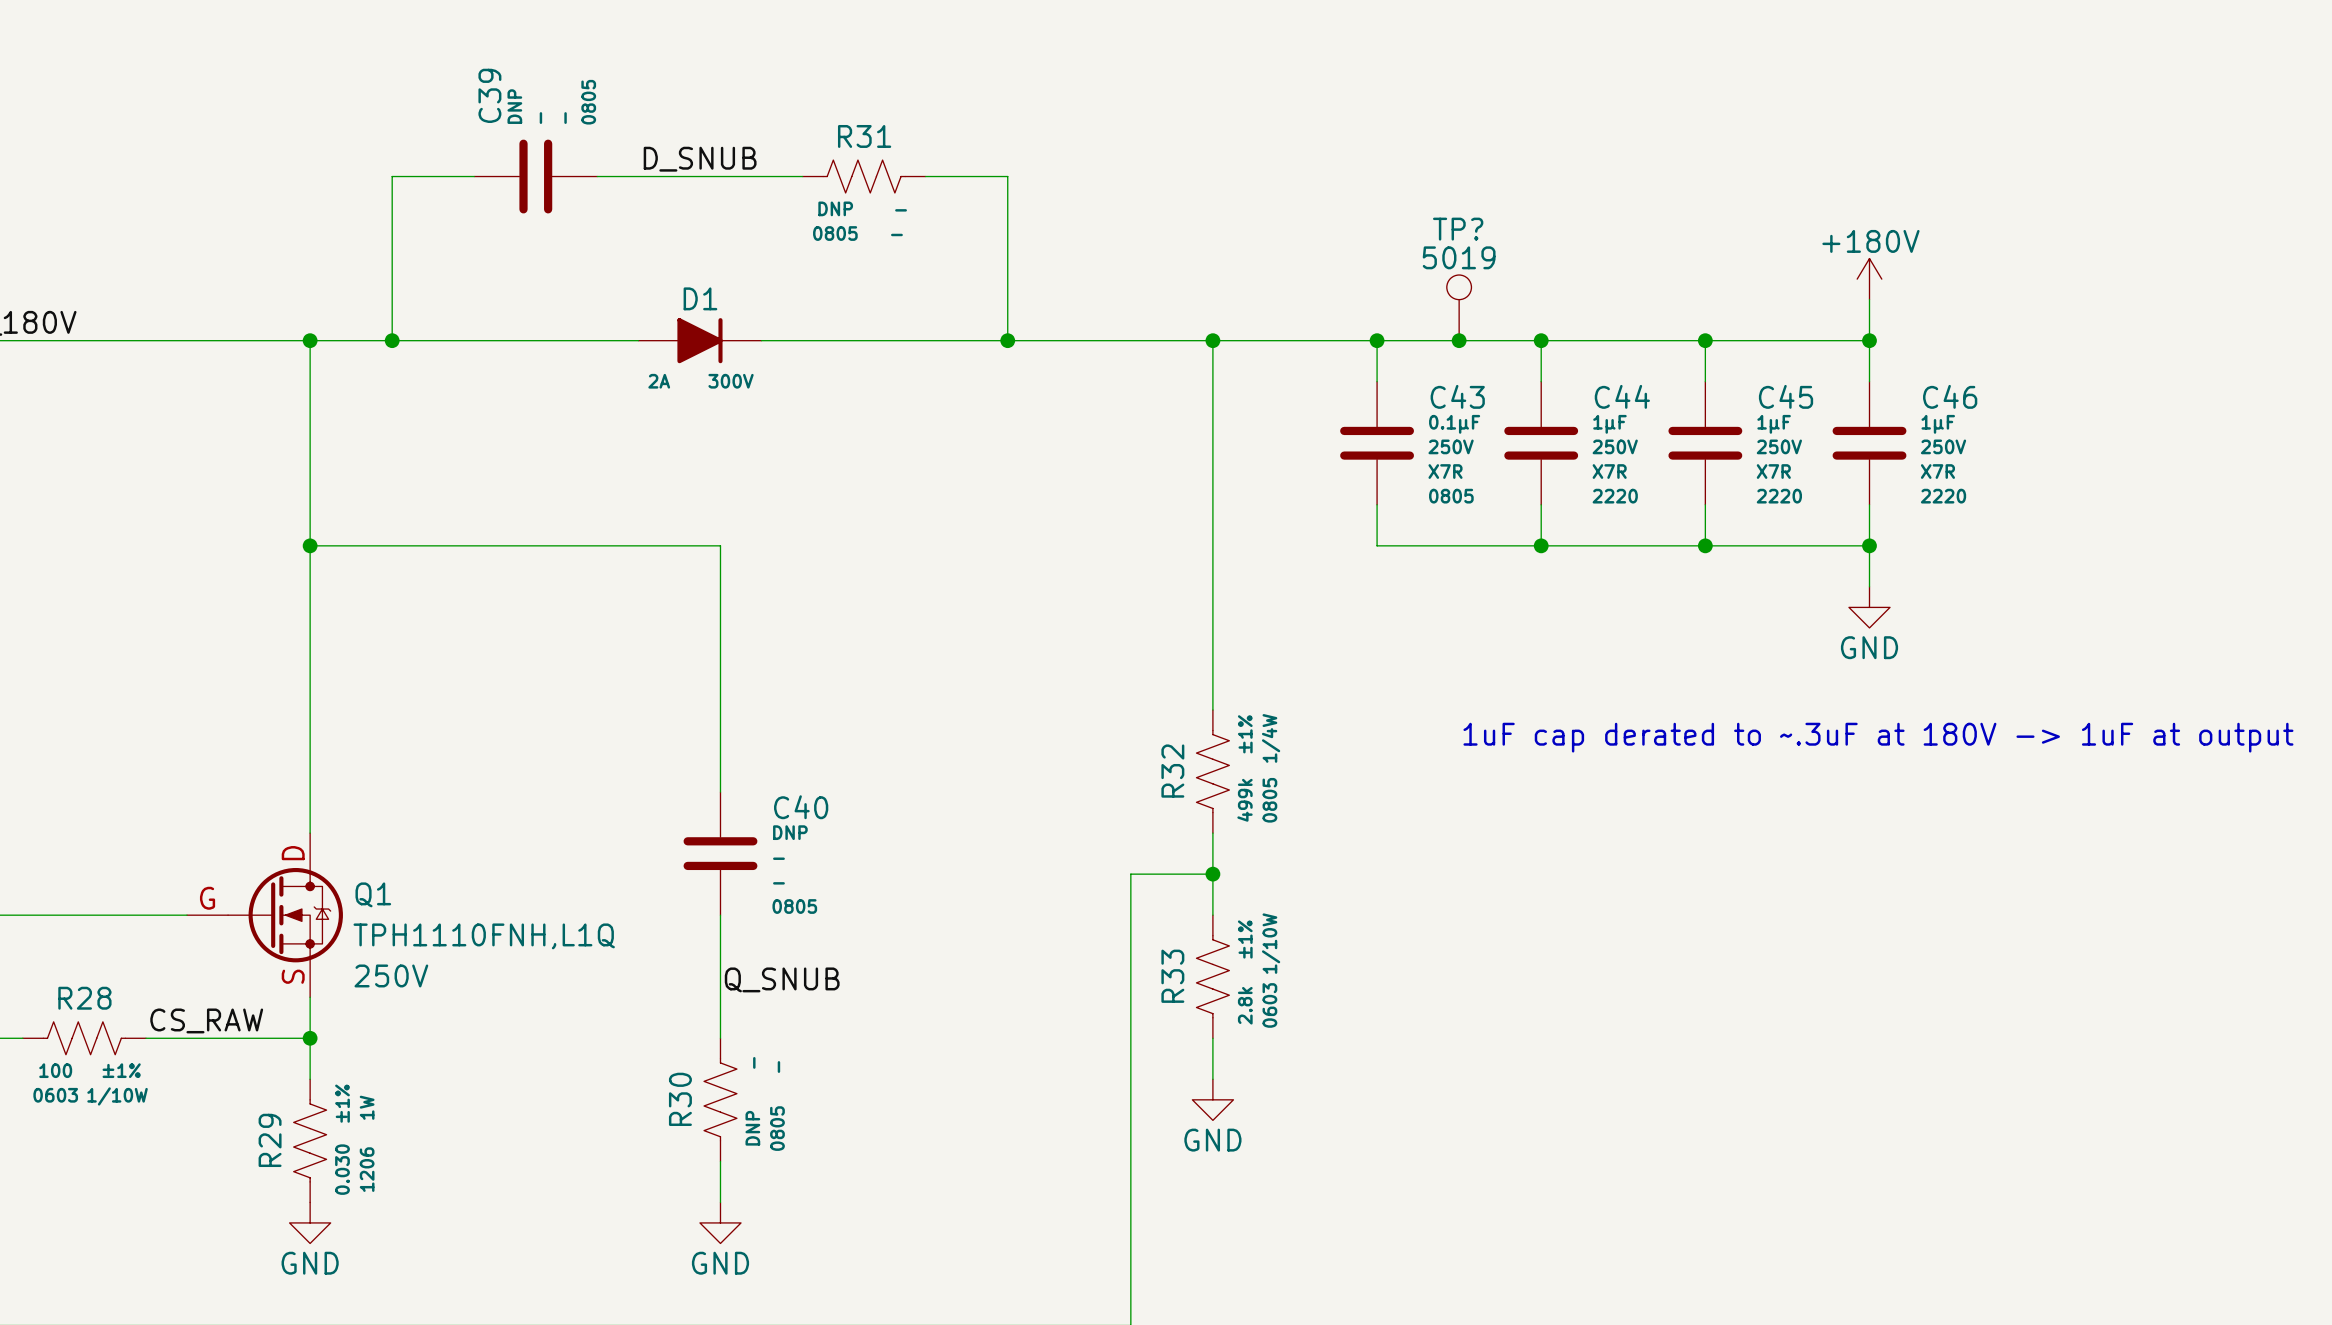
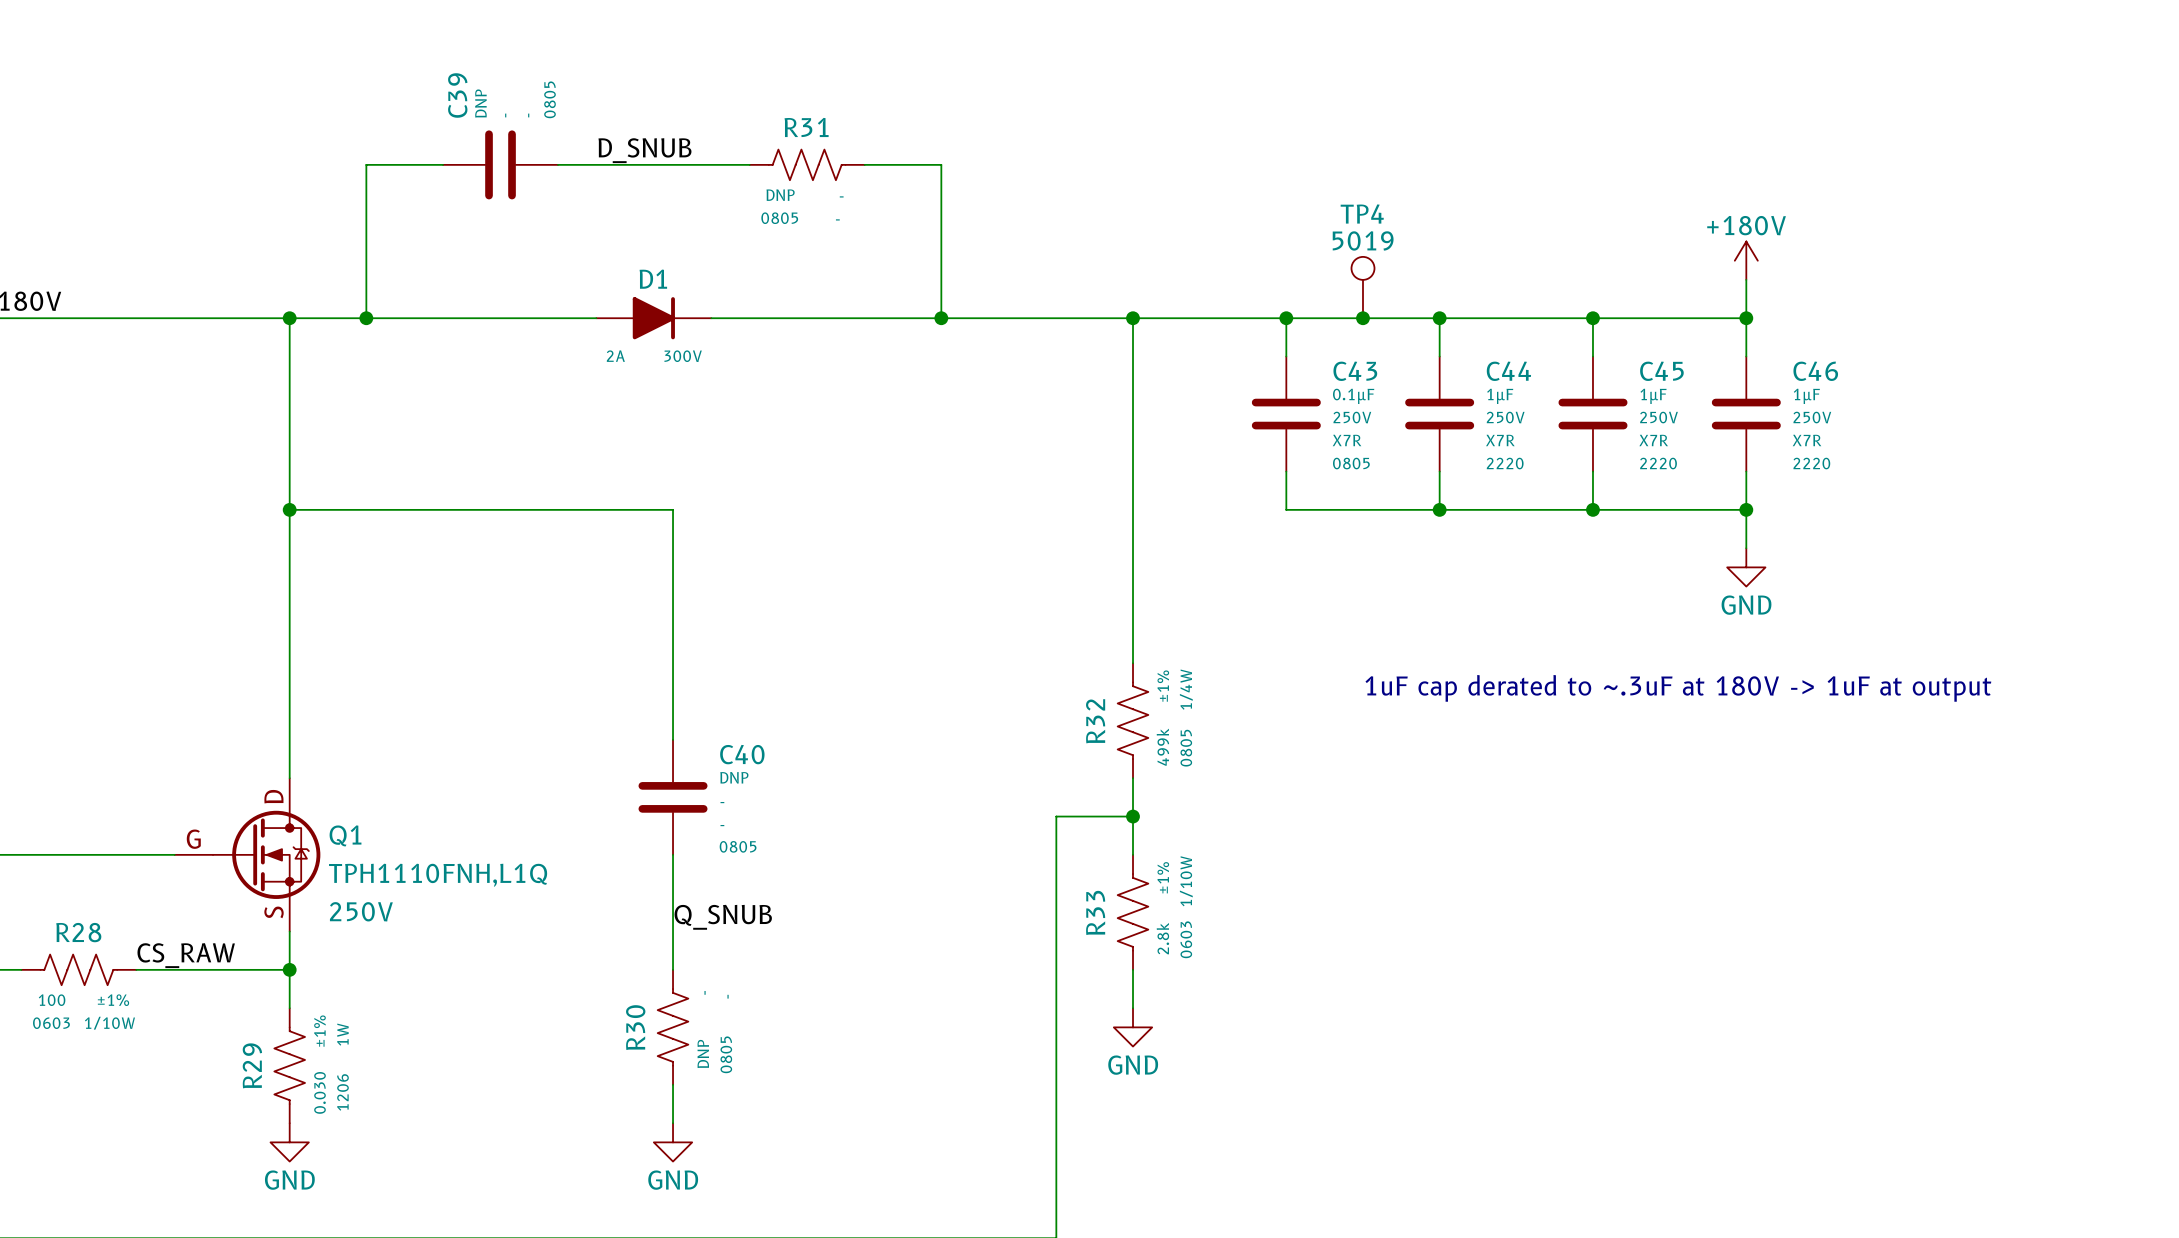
TP? name: TP? (1458, 229) -> TP4 (1362, 214)

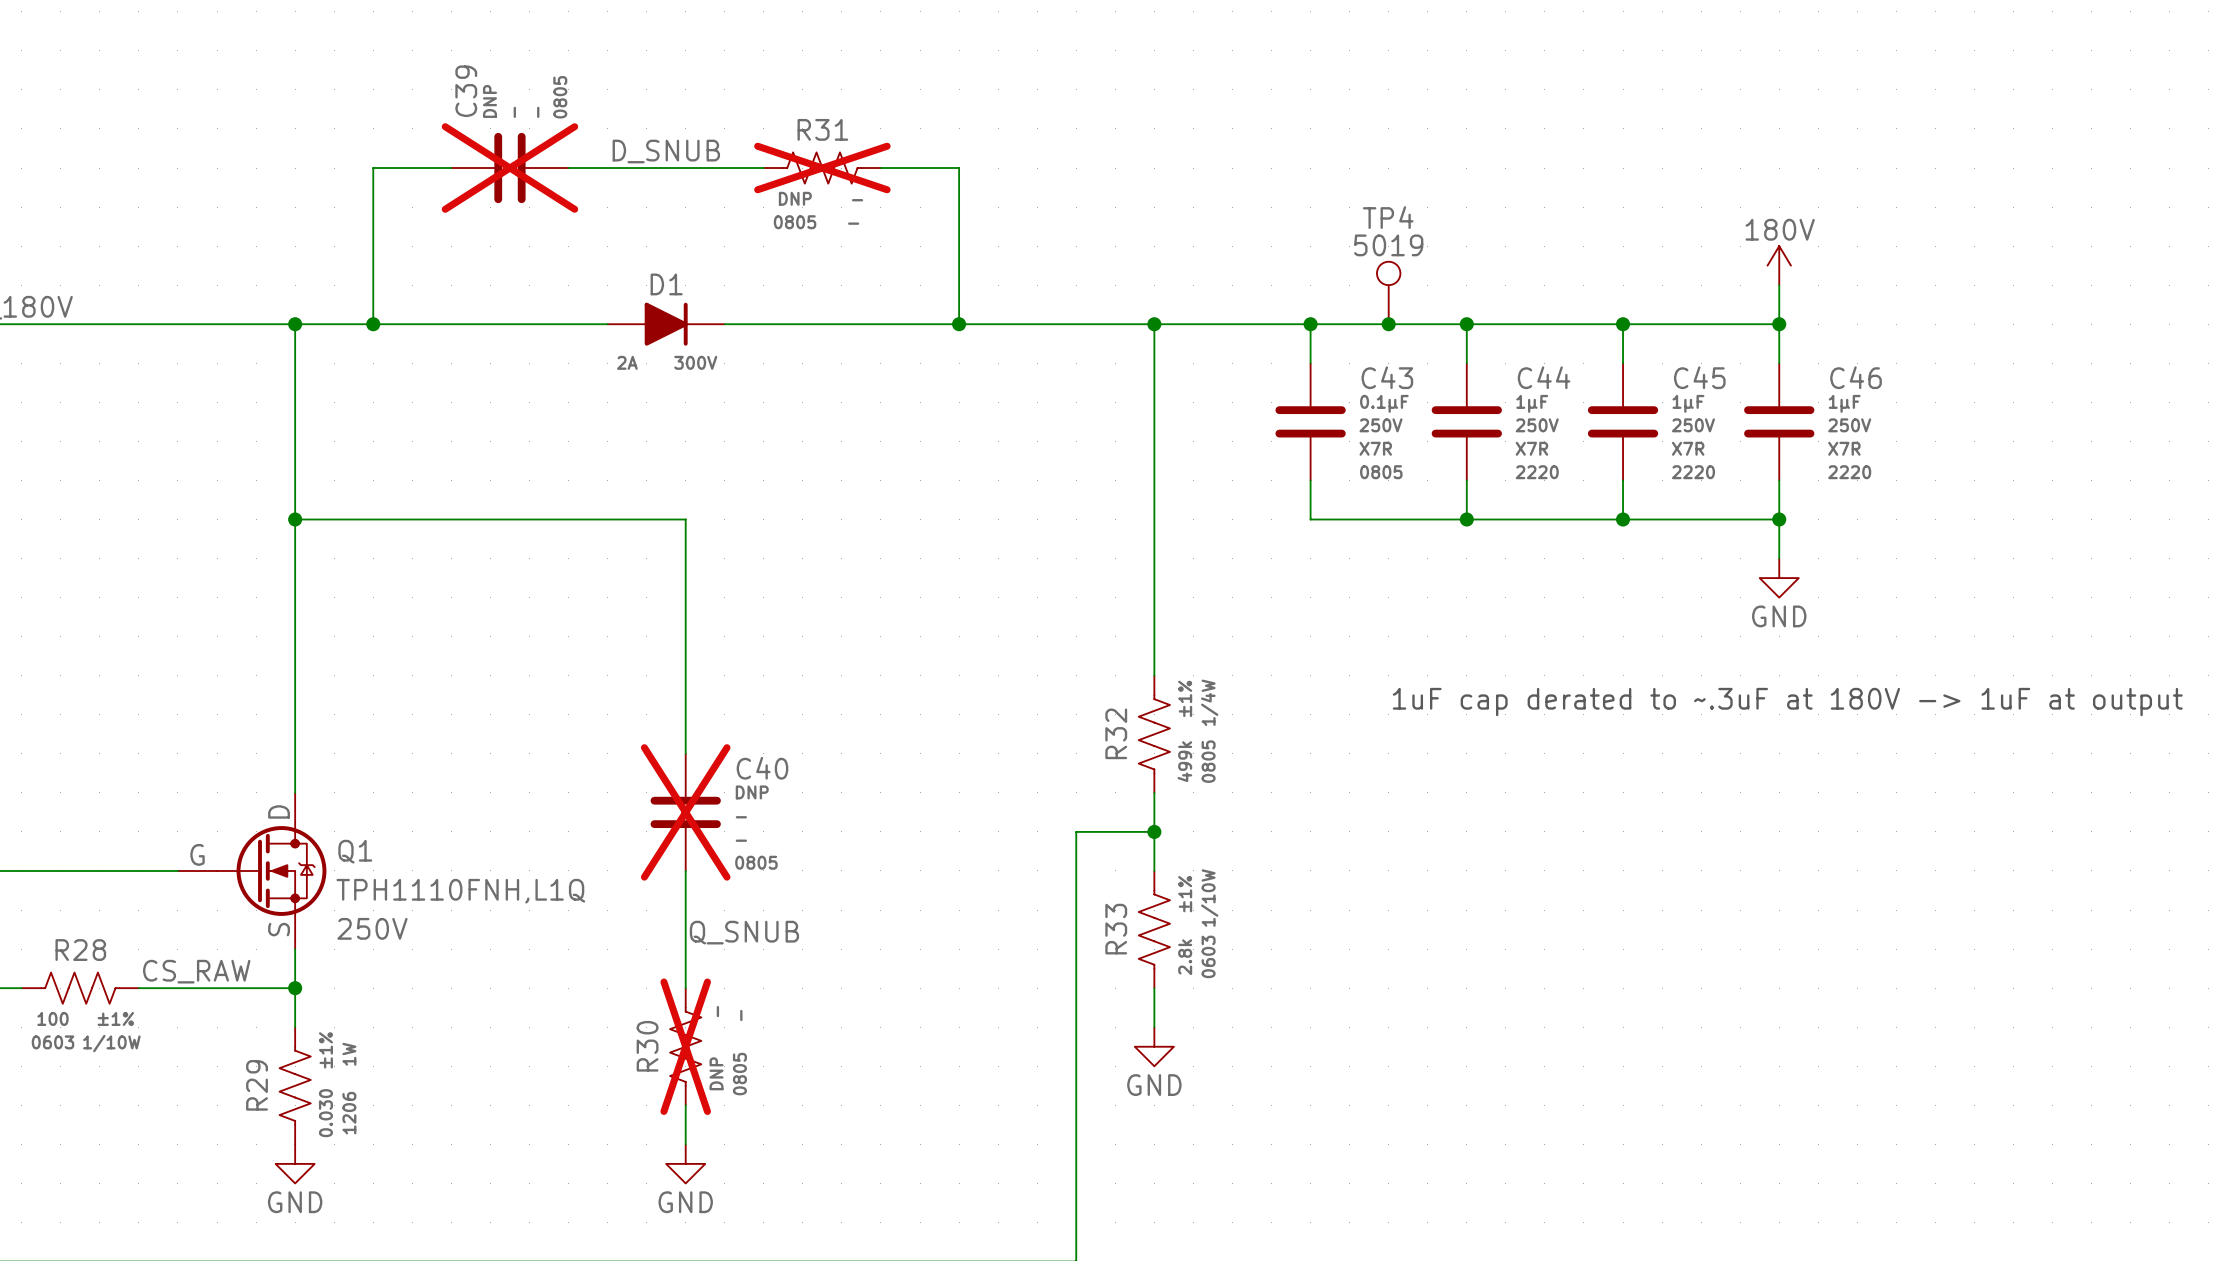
C39 do-not-place cross: none -> (509, 168)
R31 do-not-place cross: none -> (822, 168)
power symbol: +180V (1746, 260) -> 180V (1779, 265)
C40 do-not-place cross: none -> (685, 812)
R30 do-not-place cross: none -> (685, 1046)

